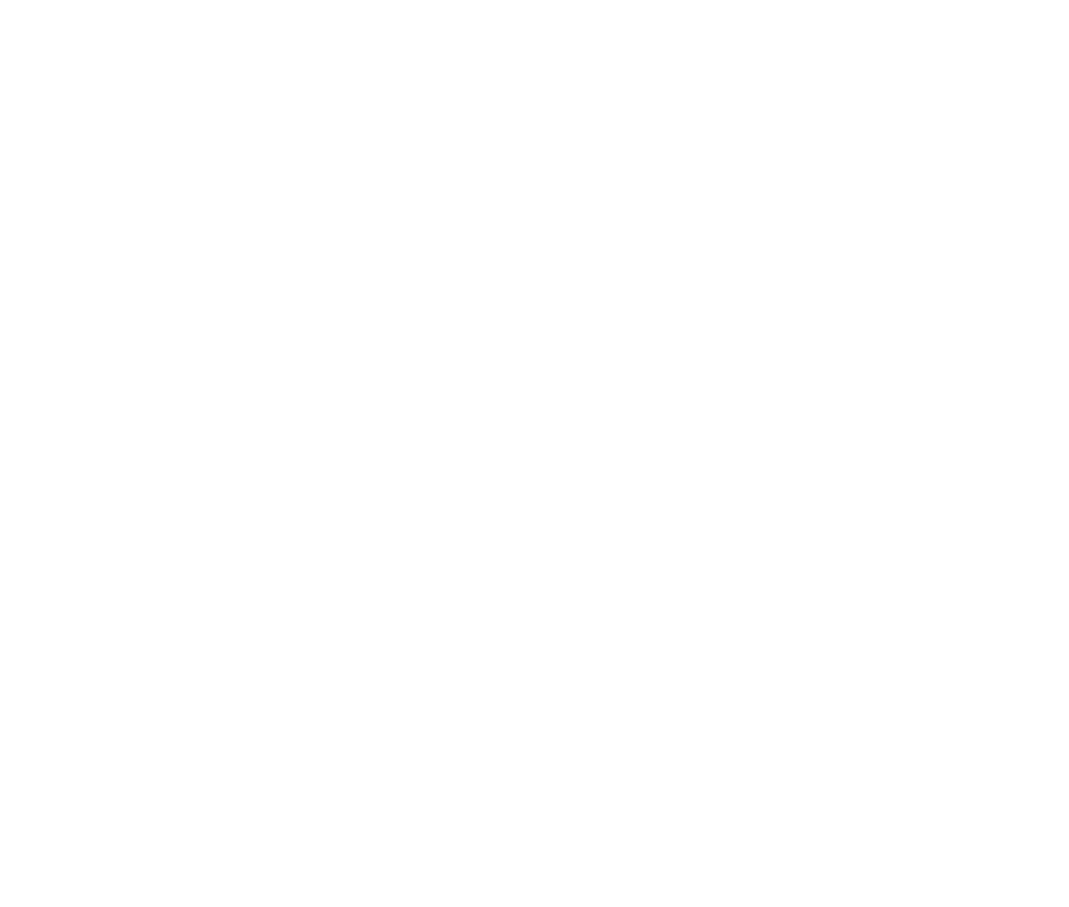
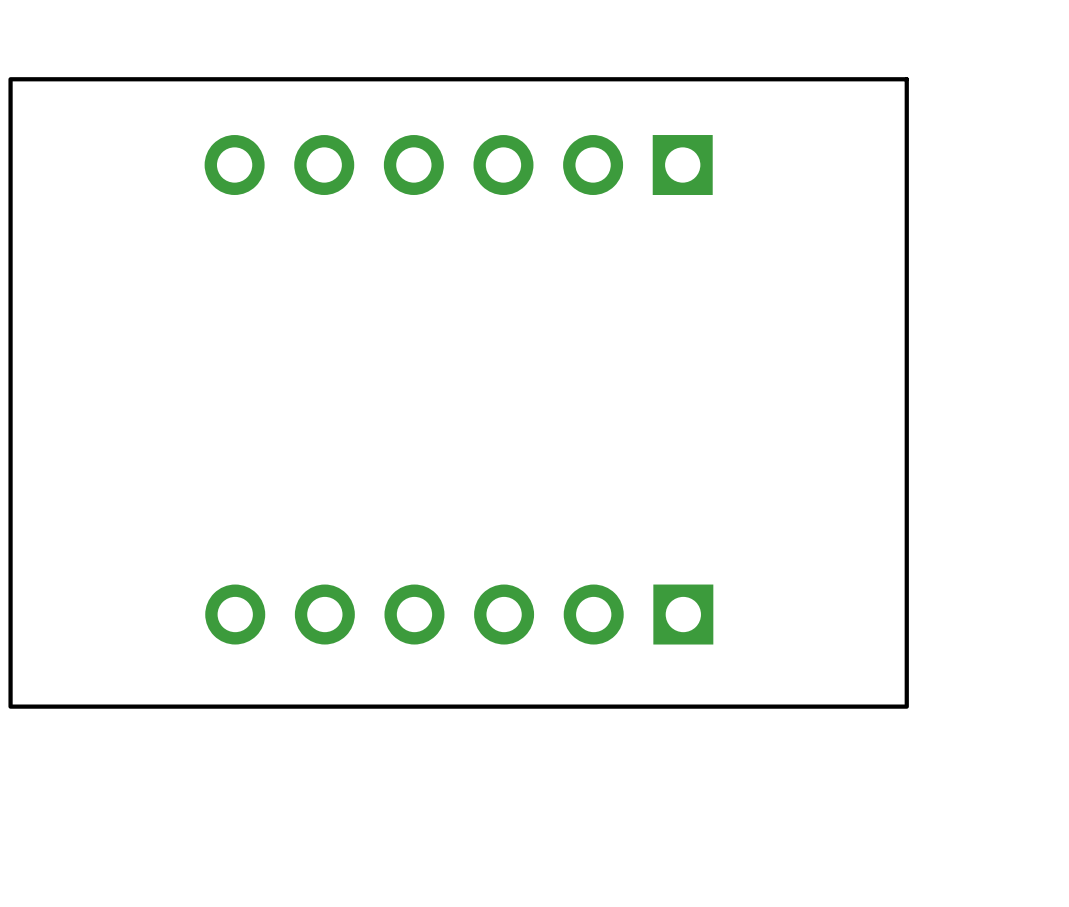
part: none -> (458, 392)

